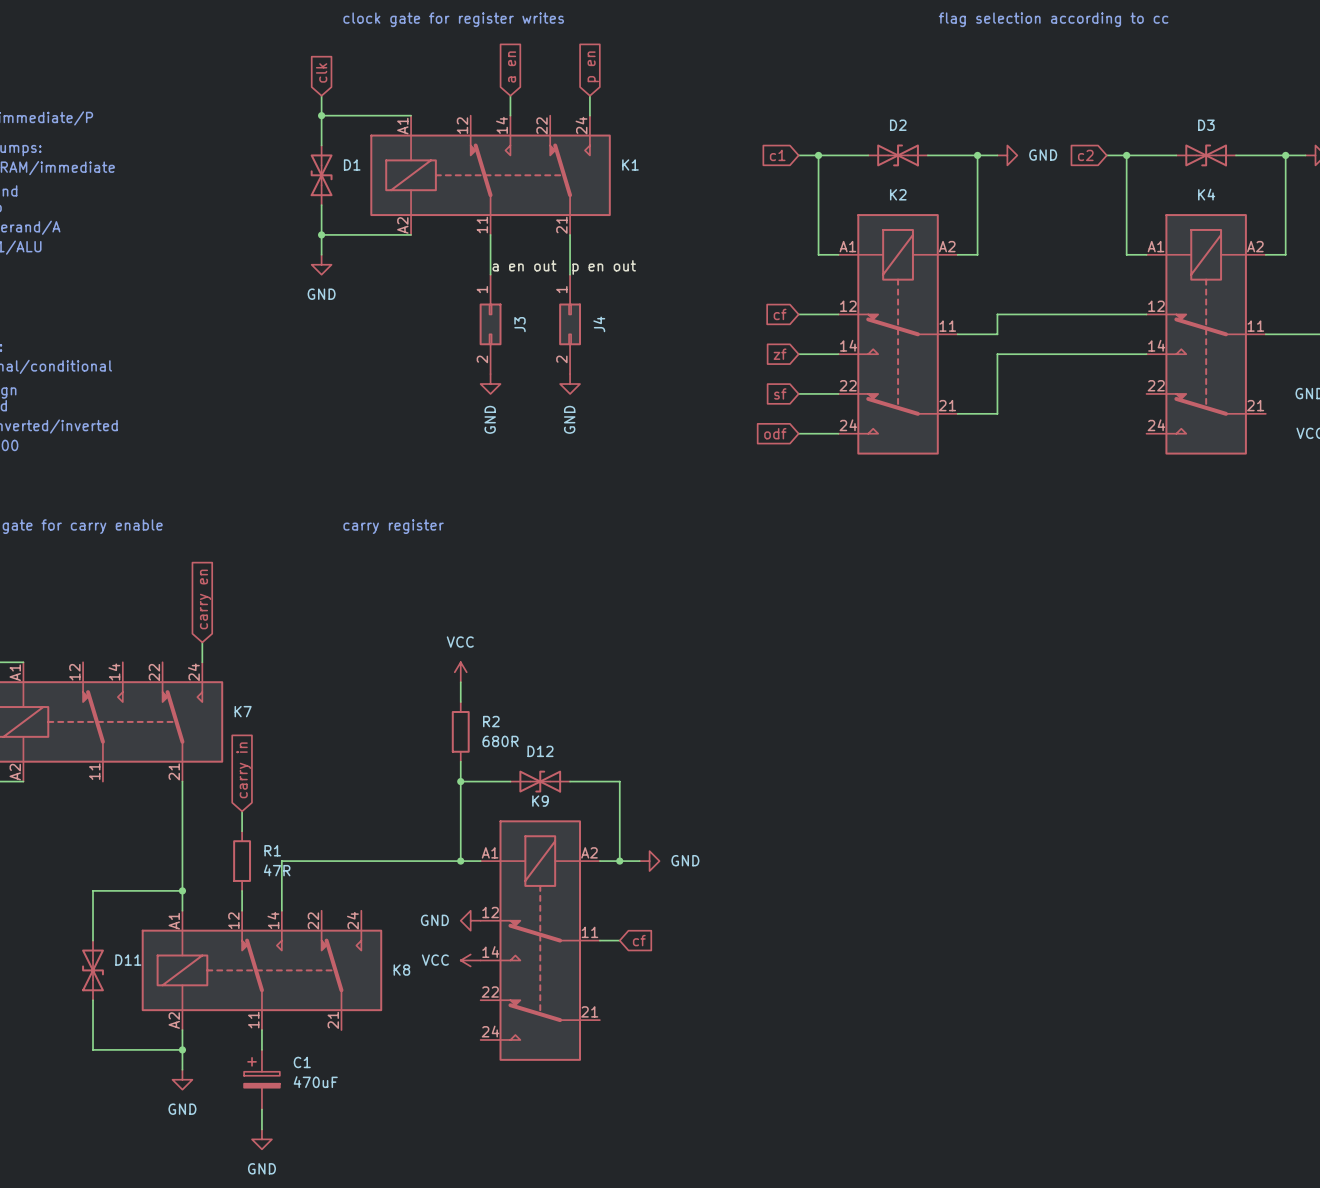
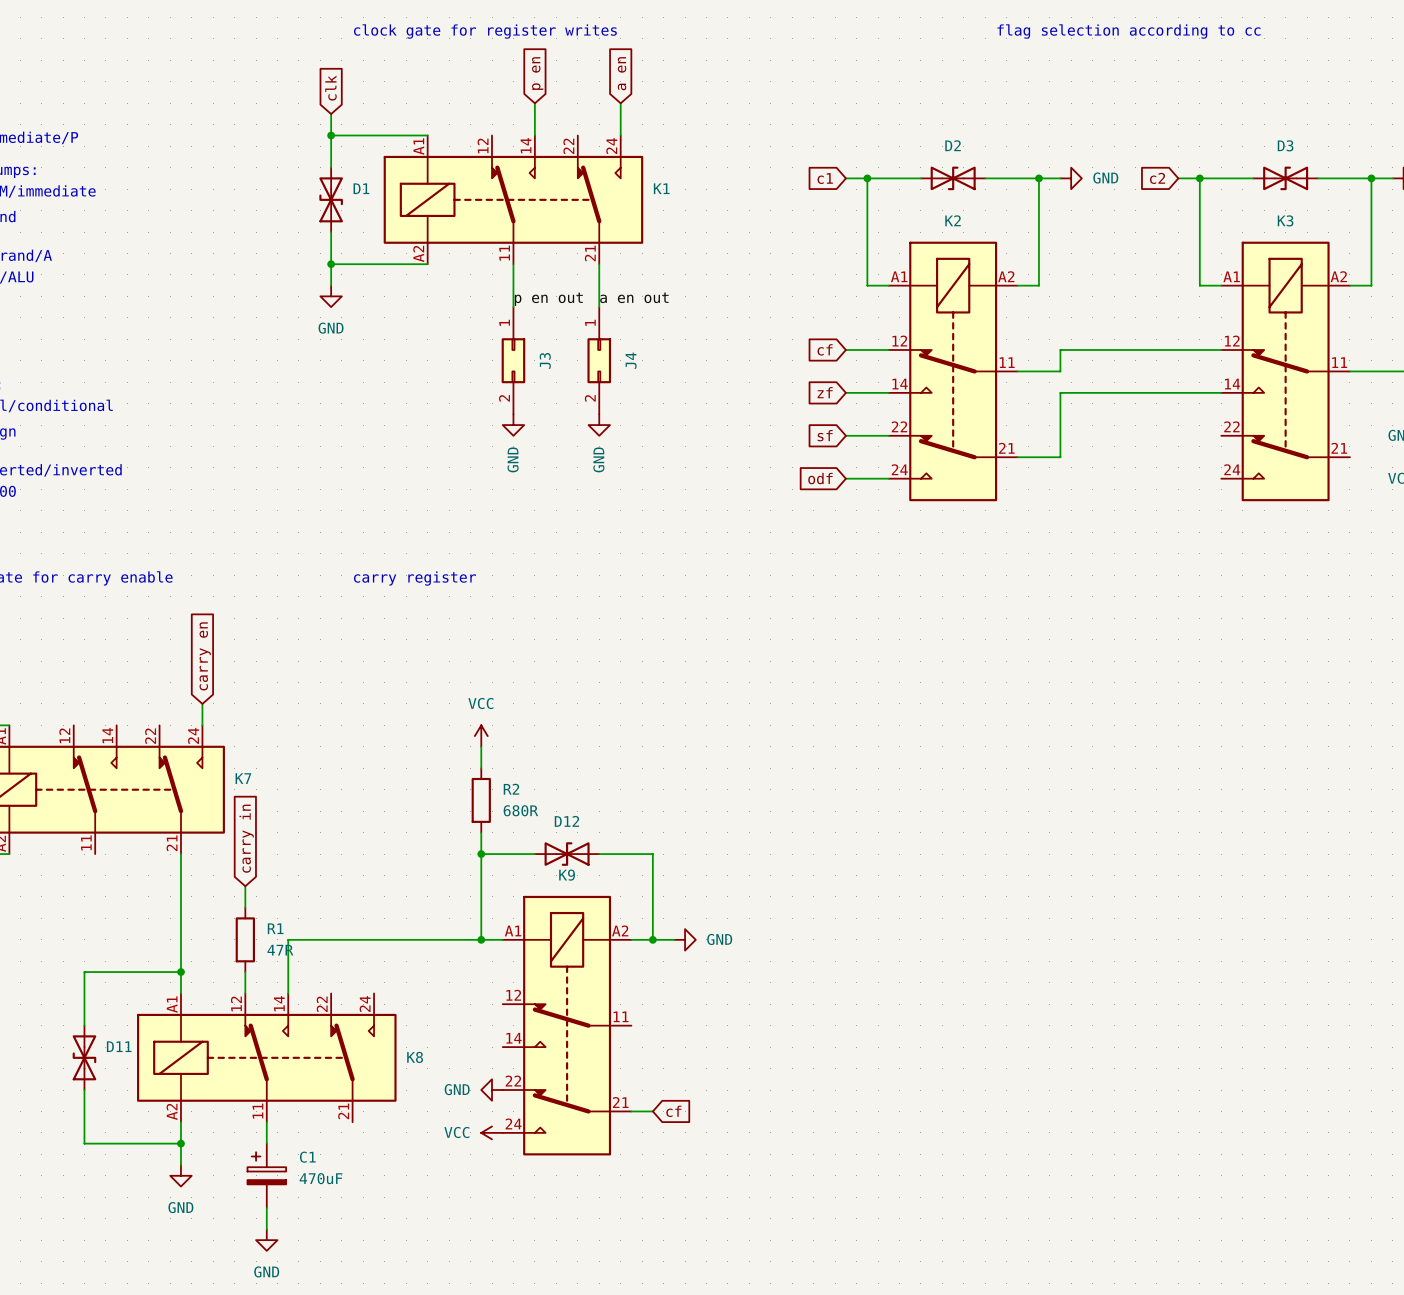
global label position: p en (593, 66) -> p en (537, 73)
global label position: a en (512, 67) -> a en (622, 73)
wire: none -> (534, 103) (534, 114)
wire: none -> (620, 103) (620, 114)
K4 name: K4 (1206, 194) -> K3 (1285, 220)
label: a en out (524, 265) -> p en out (548, 299)
label: p en out (604, 267) -> a en out (634, 297)
power symbol position: GND (470, 920) -> GND (492, 1090)
wire: (599, 940) (619, 940) -> (631, 1111) (652, 1111)
global label position: cf (639, 940) -> cf (673, 1111)
power symbol position: VCC (470, 960) -> VCC (492, 1132)

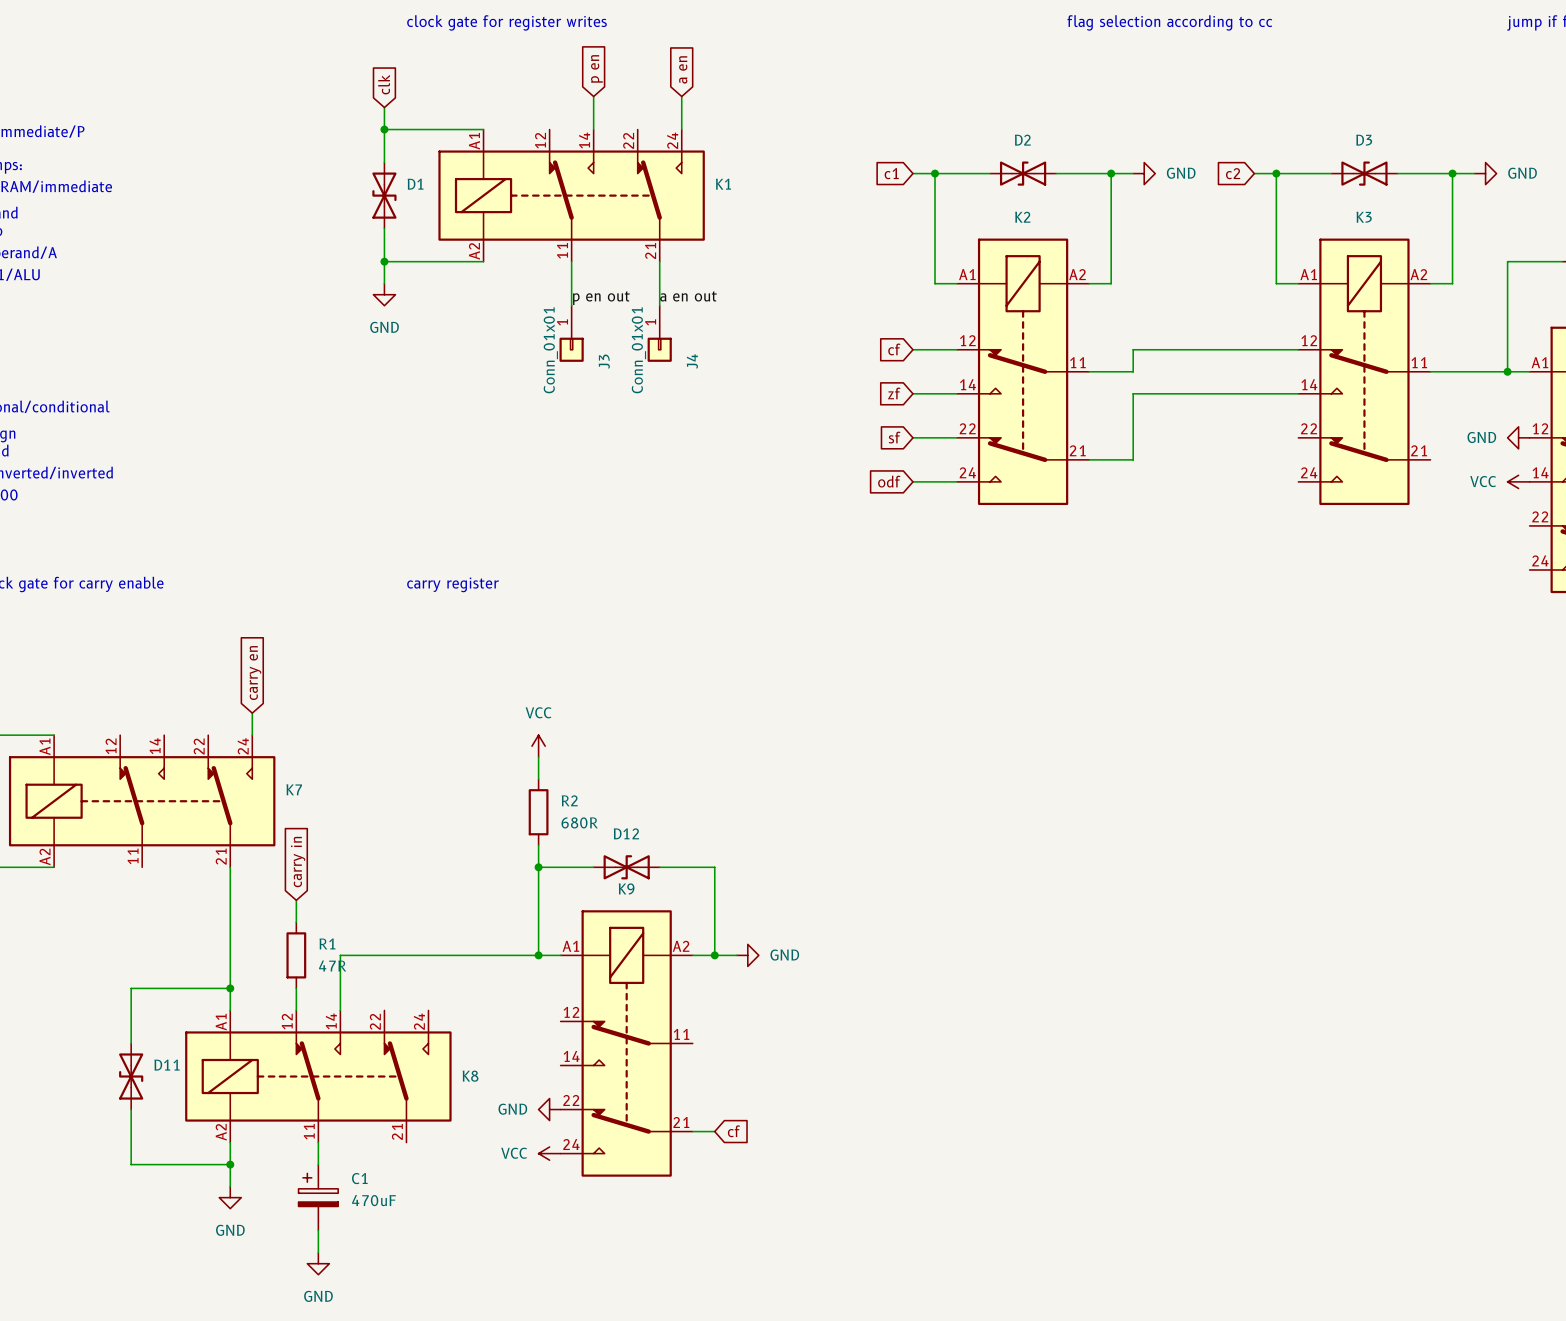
J3 symbol: [501, 307, 526, 415] -> [559, 305, 584, 362]
J4 symbol: [587, 307, 612, 415] -> [647, 305, 672, 362]
J3 value: none -> Conn_01x01 (550, 350)
J4 value: none -> Conn_01x01 (638, 350)
power symbol: GND (513, 425) -> none
power symbol: GND (599, 425) -> none

